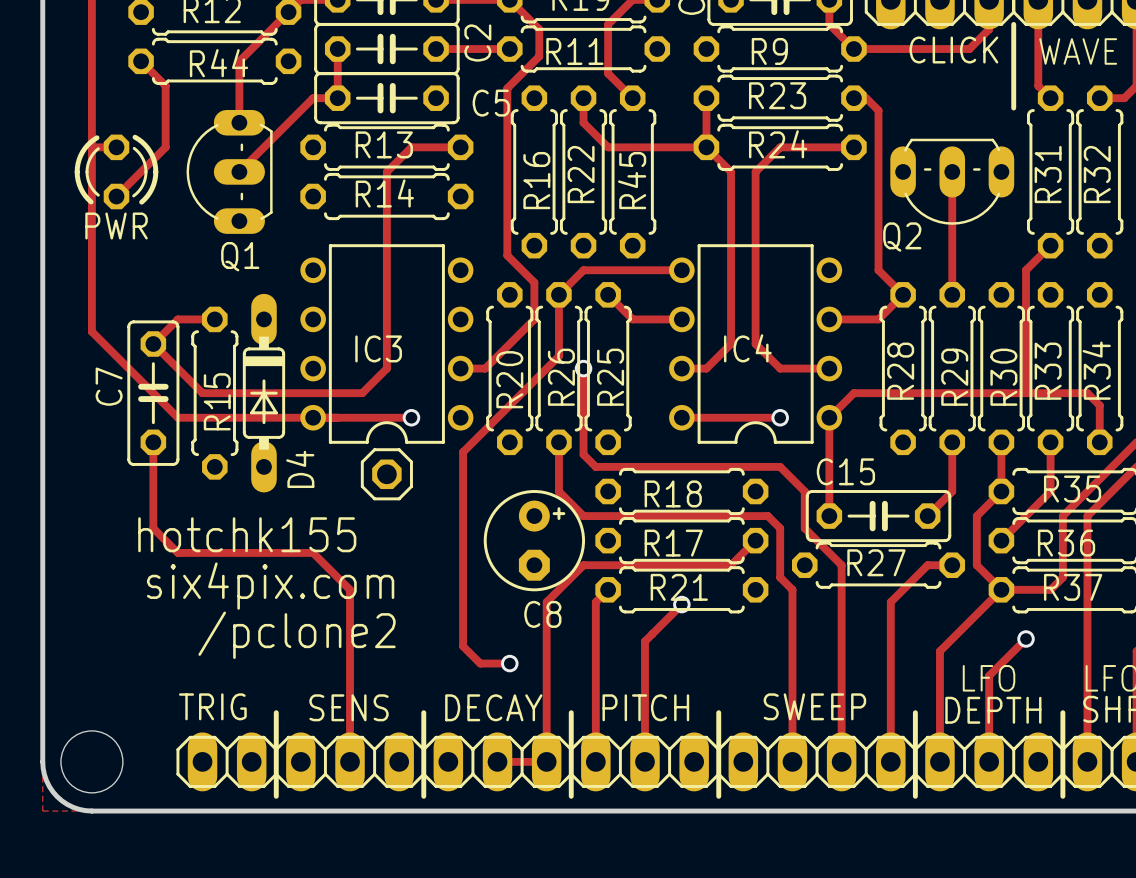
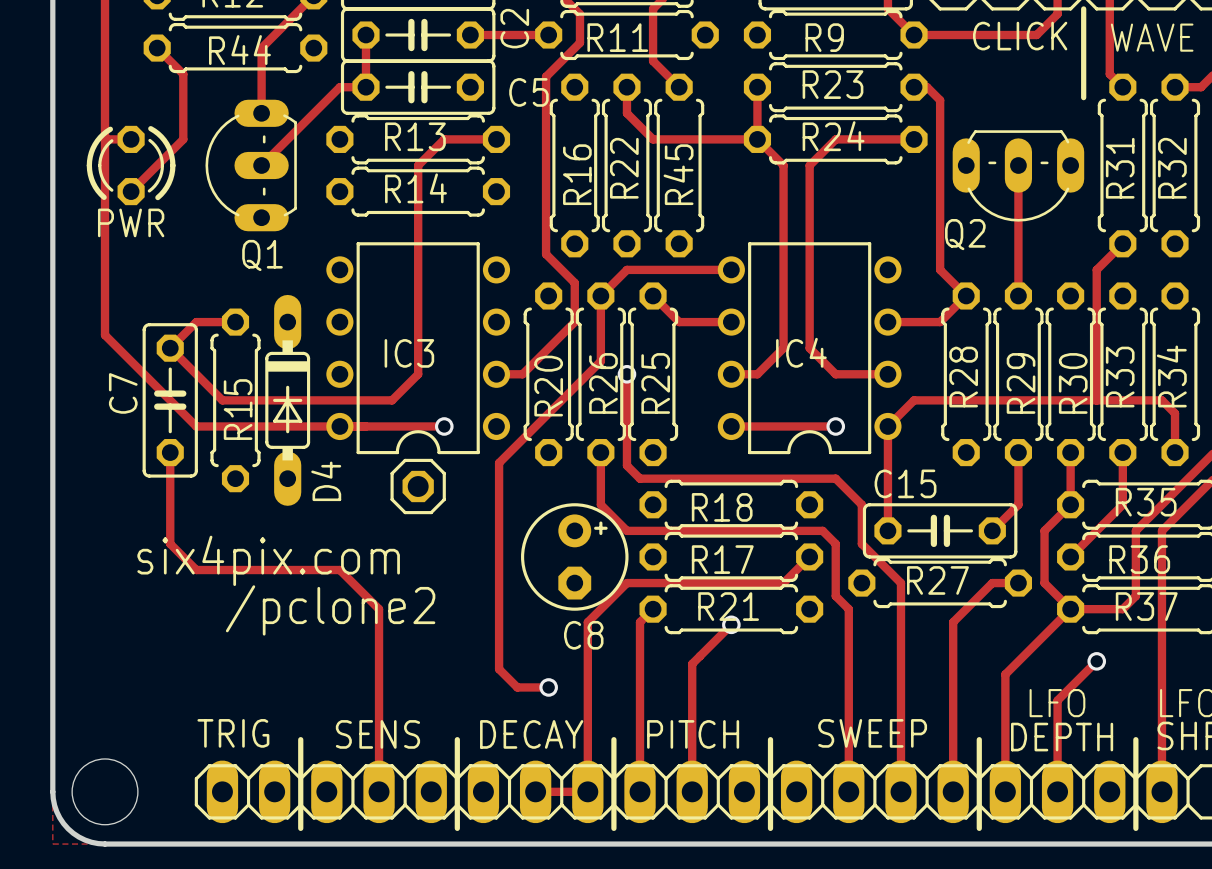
text: hotchk155 (247, 534) -> six4pix.com (268, 560)
text: six4pix.com (270, 586) -> /pclone2 (330, 610)
text: /pclone2 (297, 635) -> none

